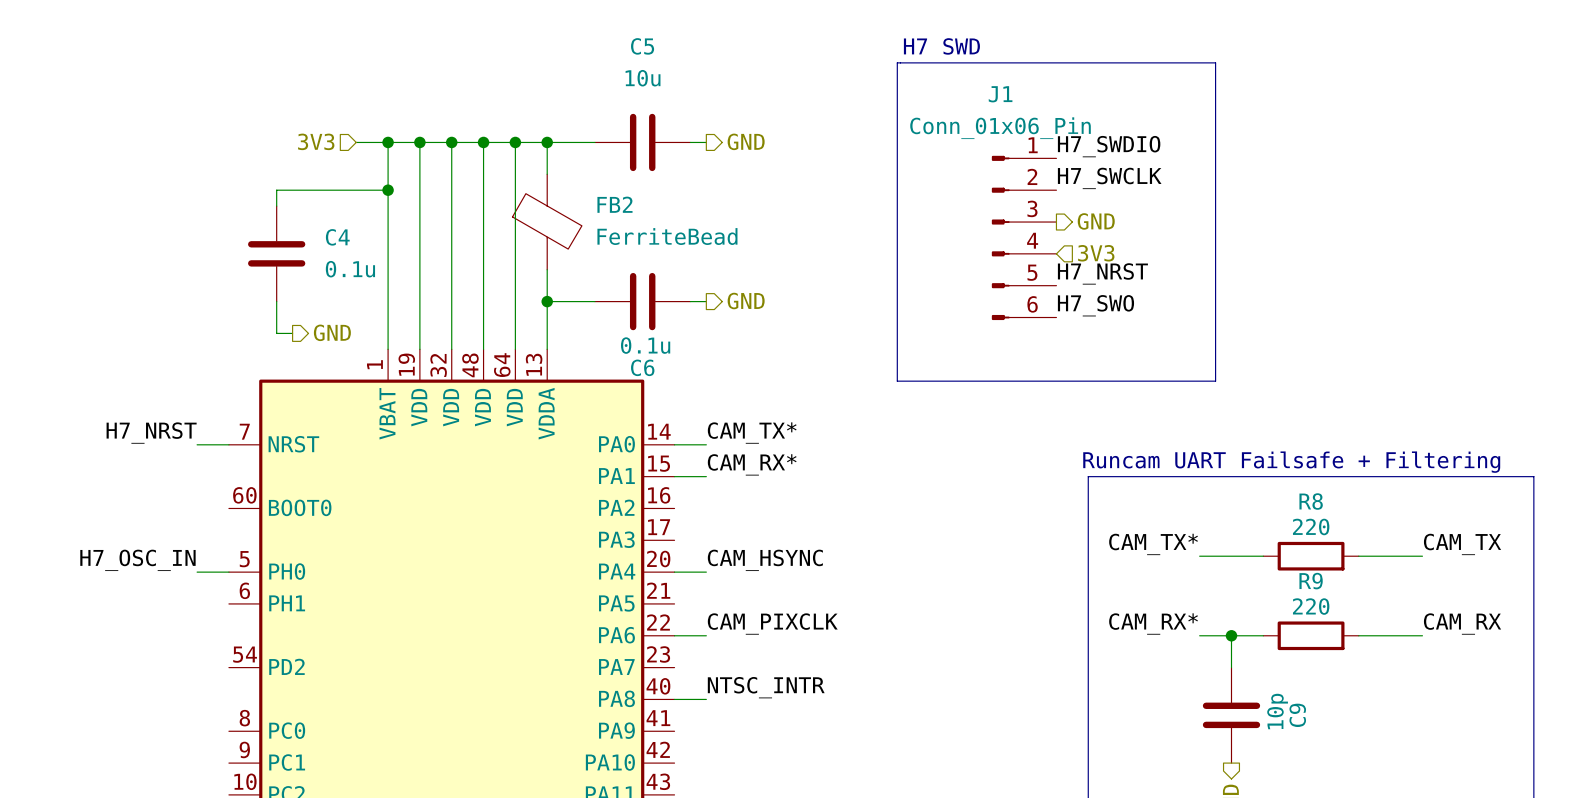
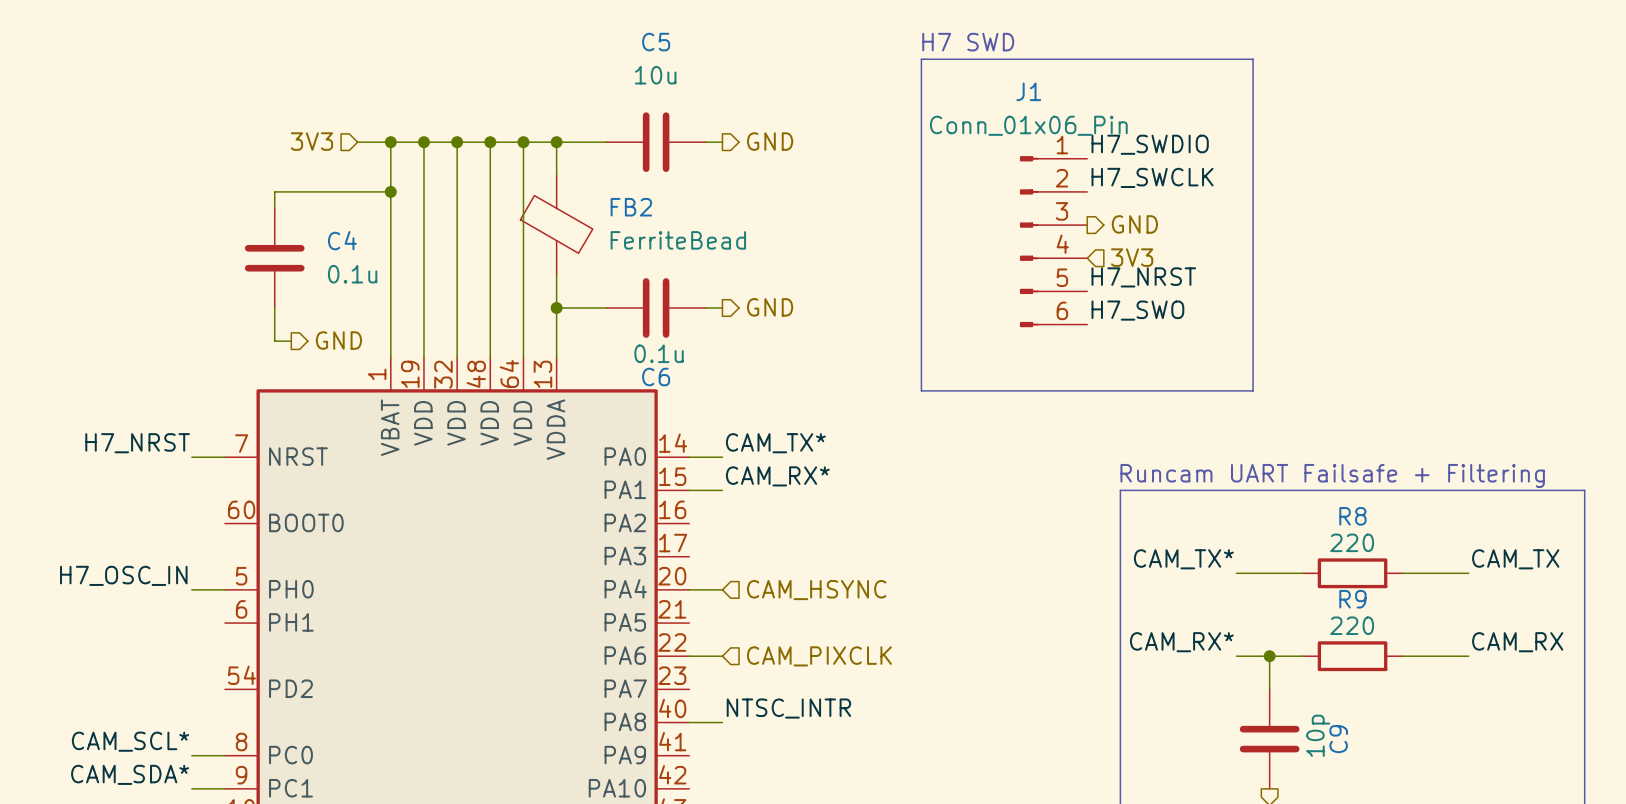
label: CAM_HSYNC (765, 560) -> none
hierarchical label: none -> CAM_HSYNC (816, 590)
label: CAM_PIXCLK (772, 624) -> none
hierarchical label: none -> CAM_PIXCLK (819, 656)
label: none -> CAM_SCL* (130, 741)
wire: none -> (191, 755) (224, 755)
label: none -> CAM_SDA* (130, 774)
wire: none -> (191, 788) (224, 788)

